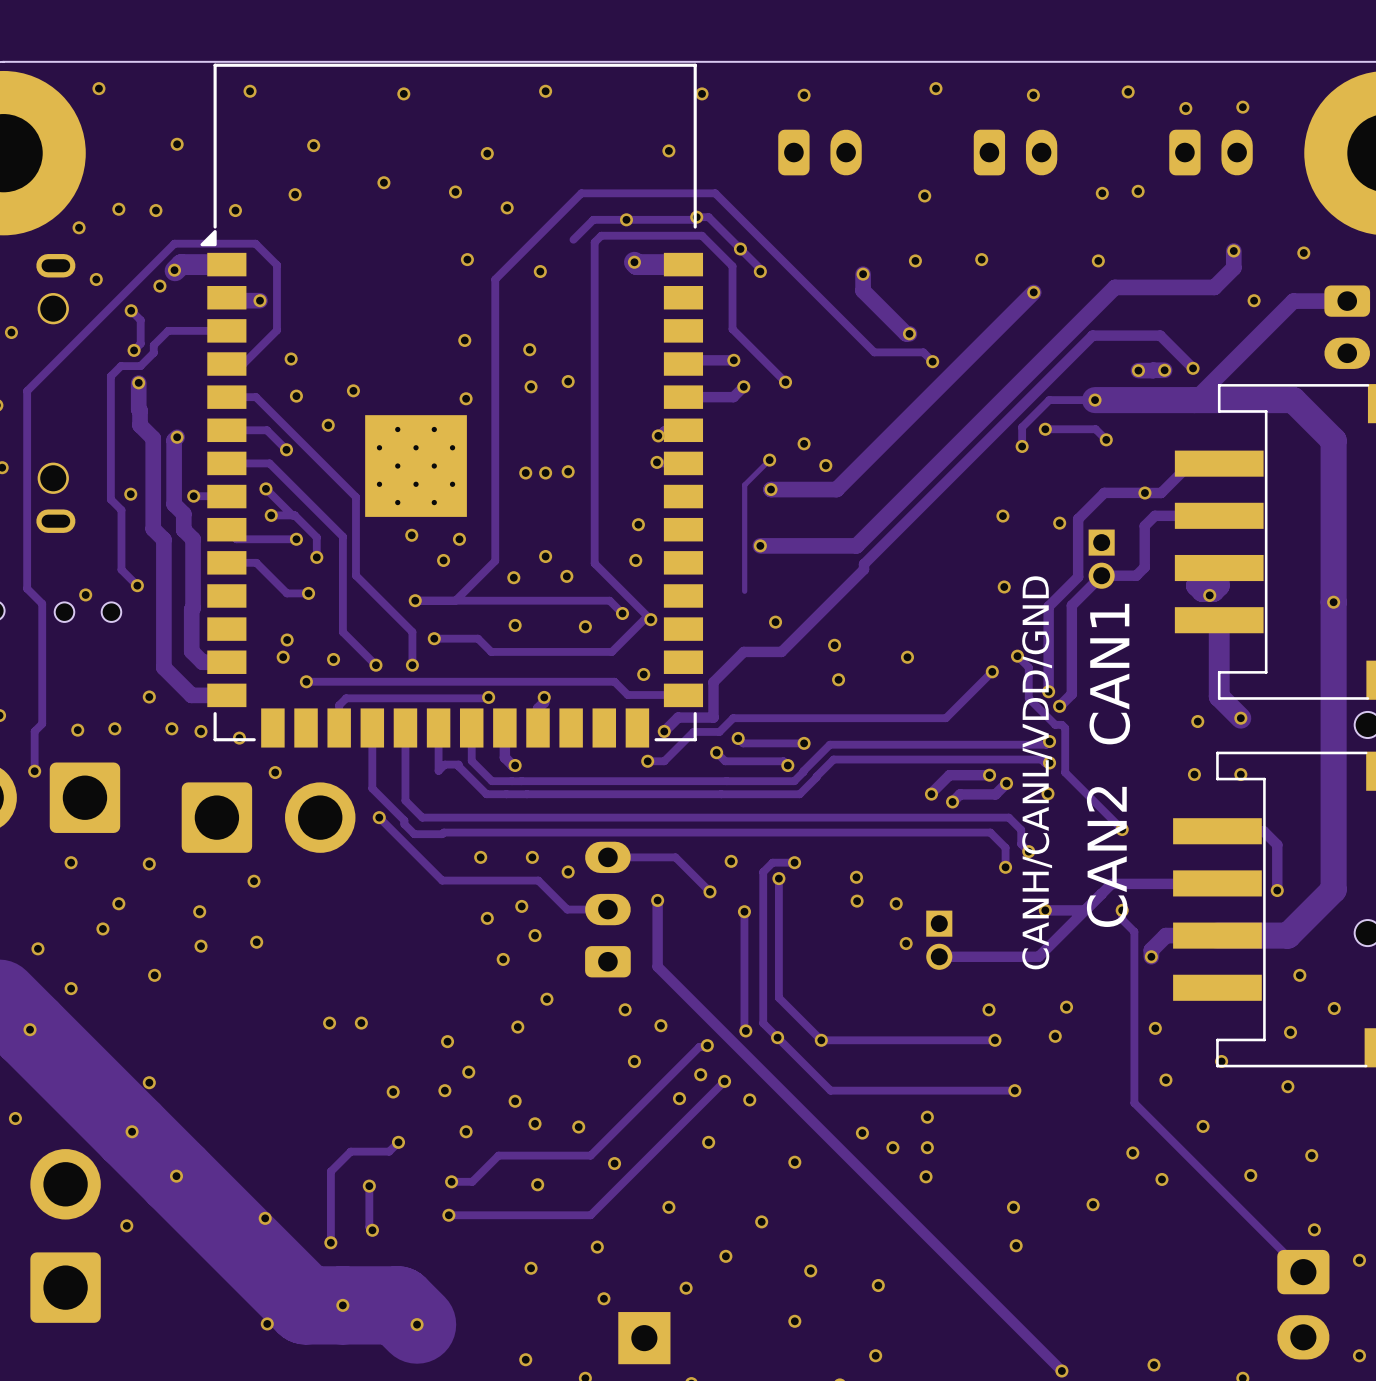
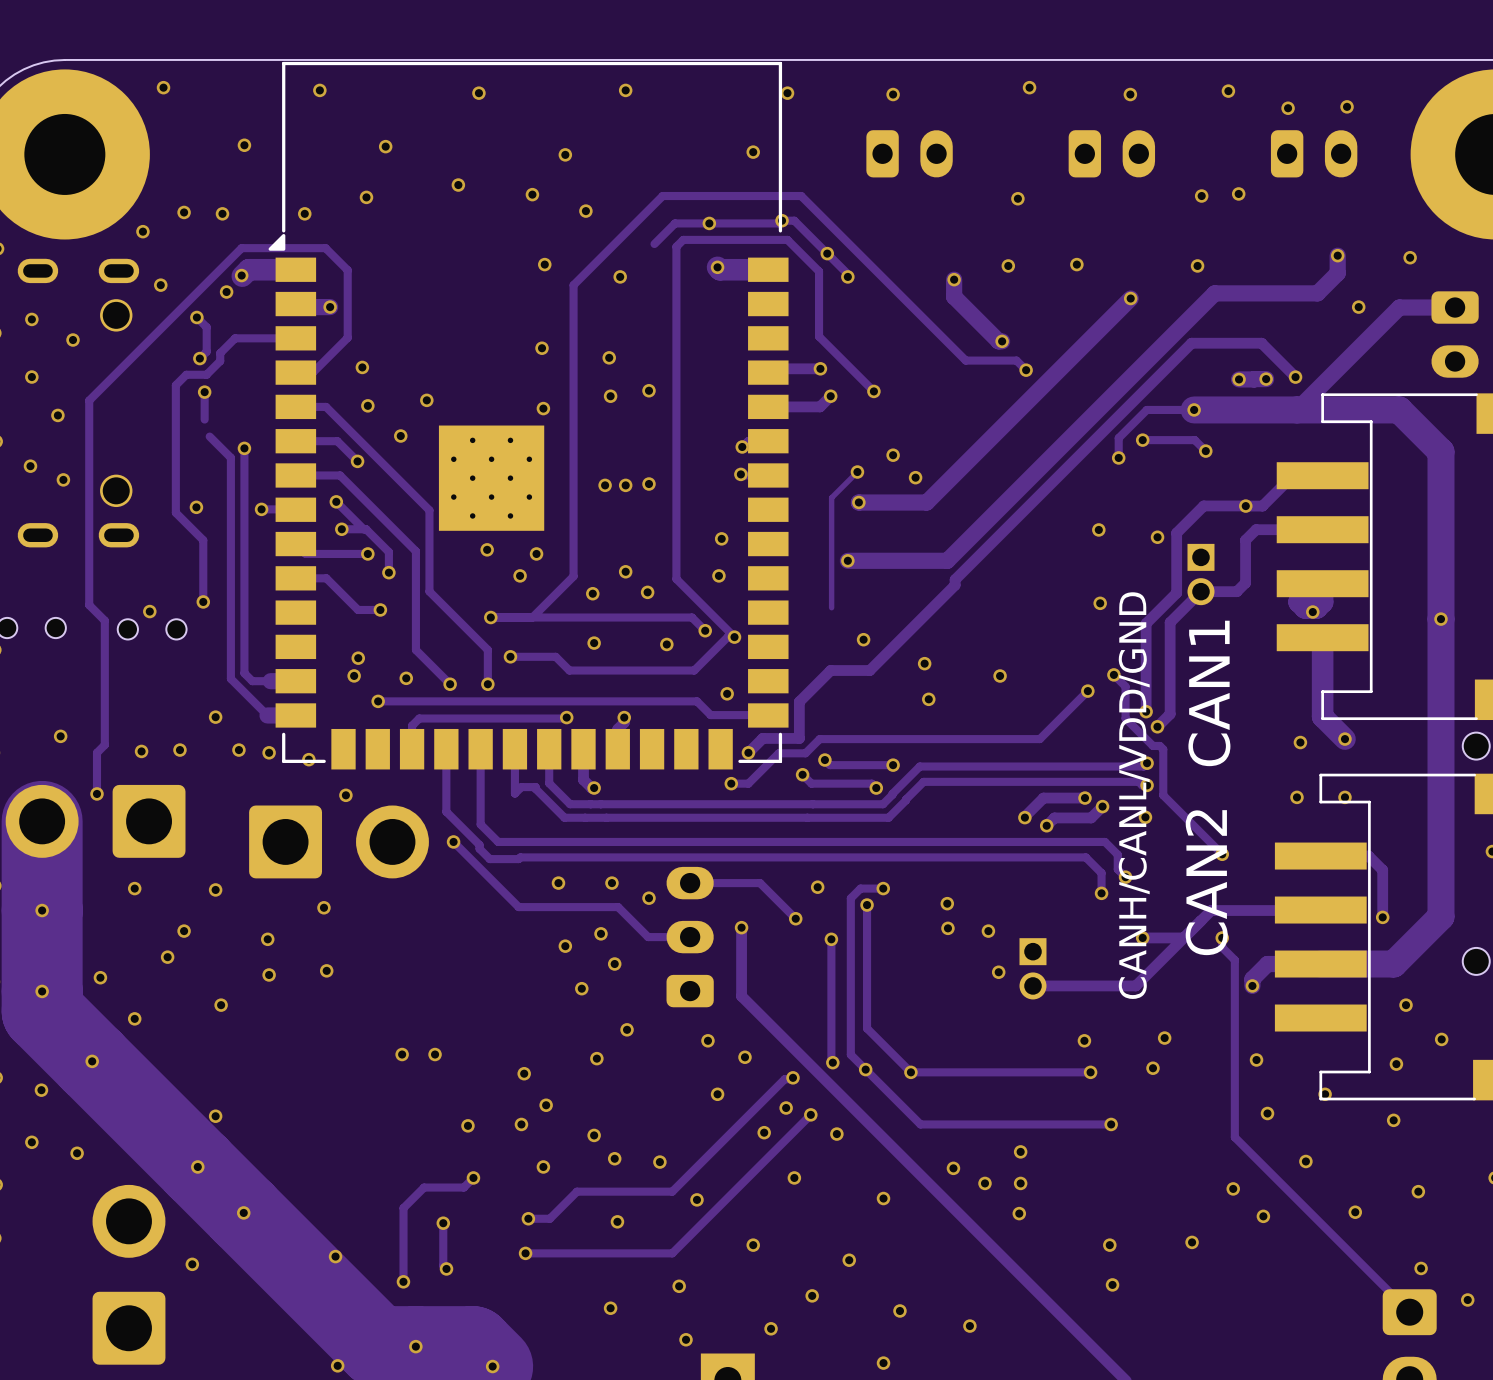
track width: thick (138, 383) (138, 409) -> thin (204, 392) (204, 419)
track: (138, 409) (140, 425) (153, 438) (153, 528) (163, 539) (163, 667) (191, 695) (199, 695) -> (209, 436) (230, 457) (230, 678) (267, 715)
track: (177, 437) (174, 440) (174, 504) (183, 513) (183, 529) (193, 539) (191, 651) (202, 662) -> (244, 448) (244, 673) (252, 681) (270, 681)
track: (121, 510) (121, 569) (137, 585) -> (186, 523) (203, 540) (203, 601)

